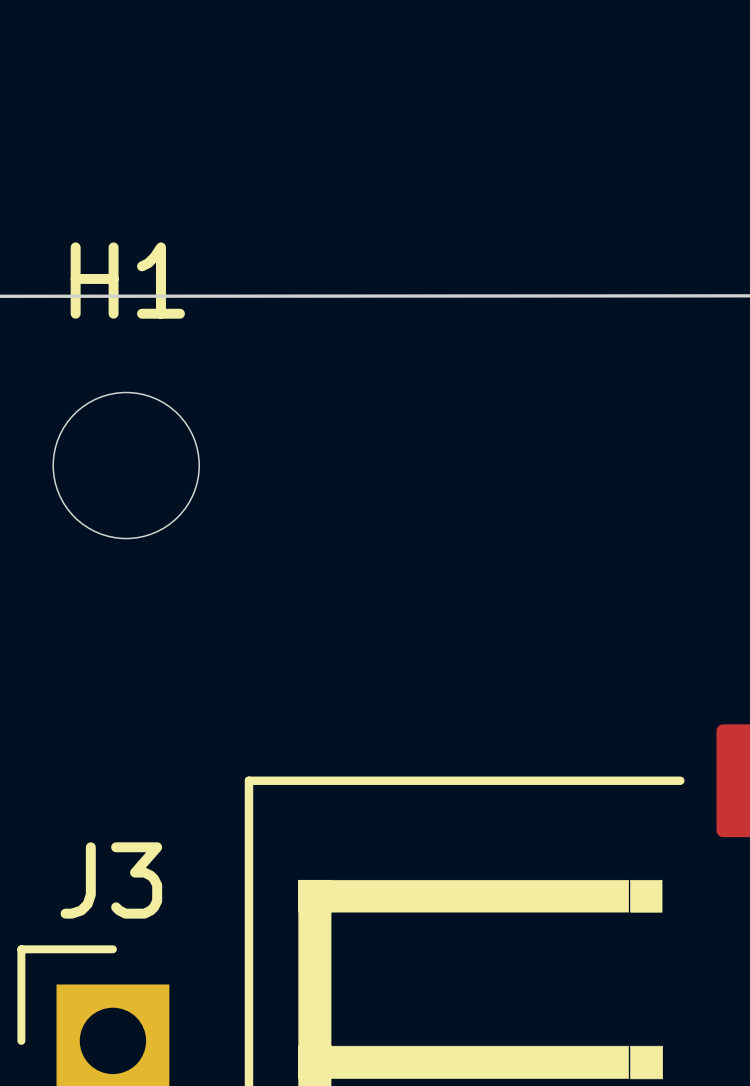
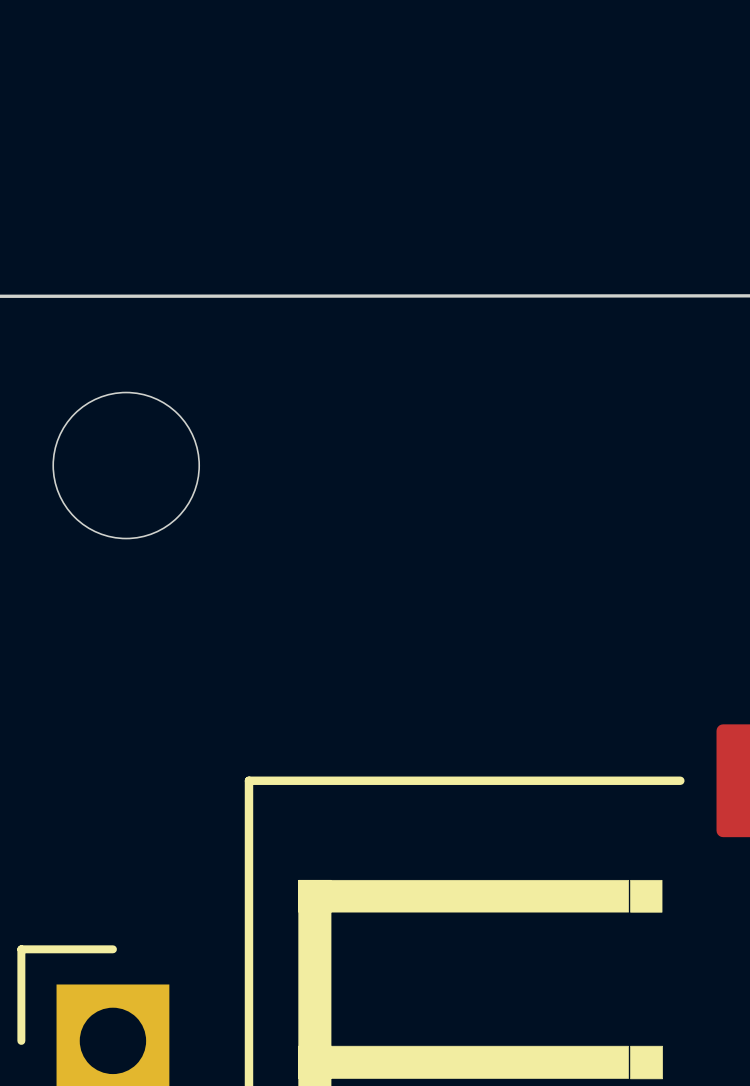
H1 name: H1 (127, 280) -> none
J3 name: J3 (111, 880) -> none

